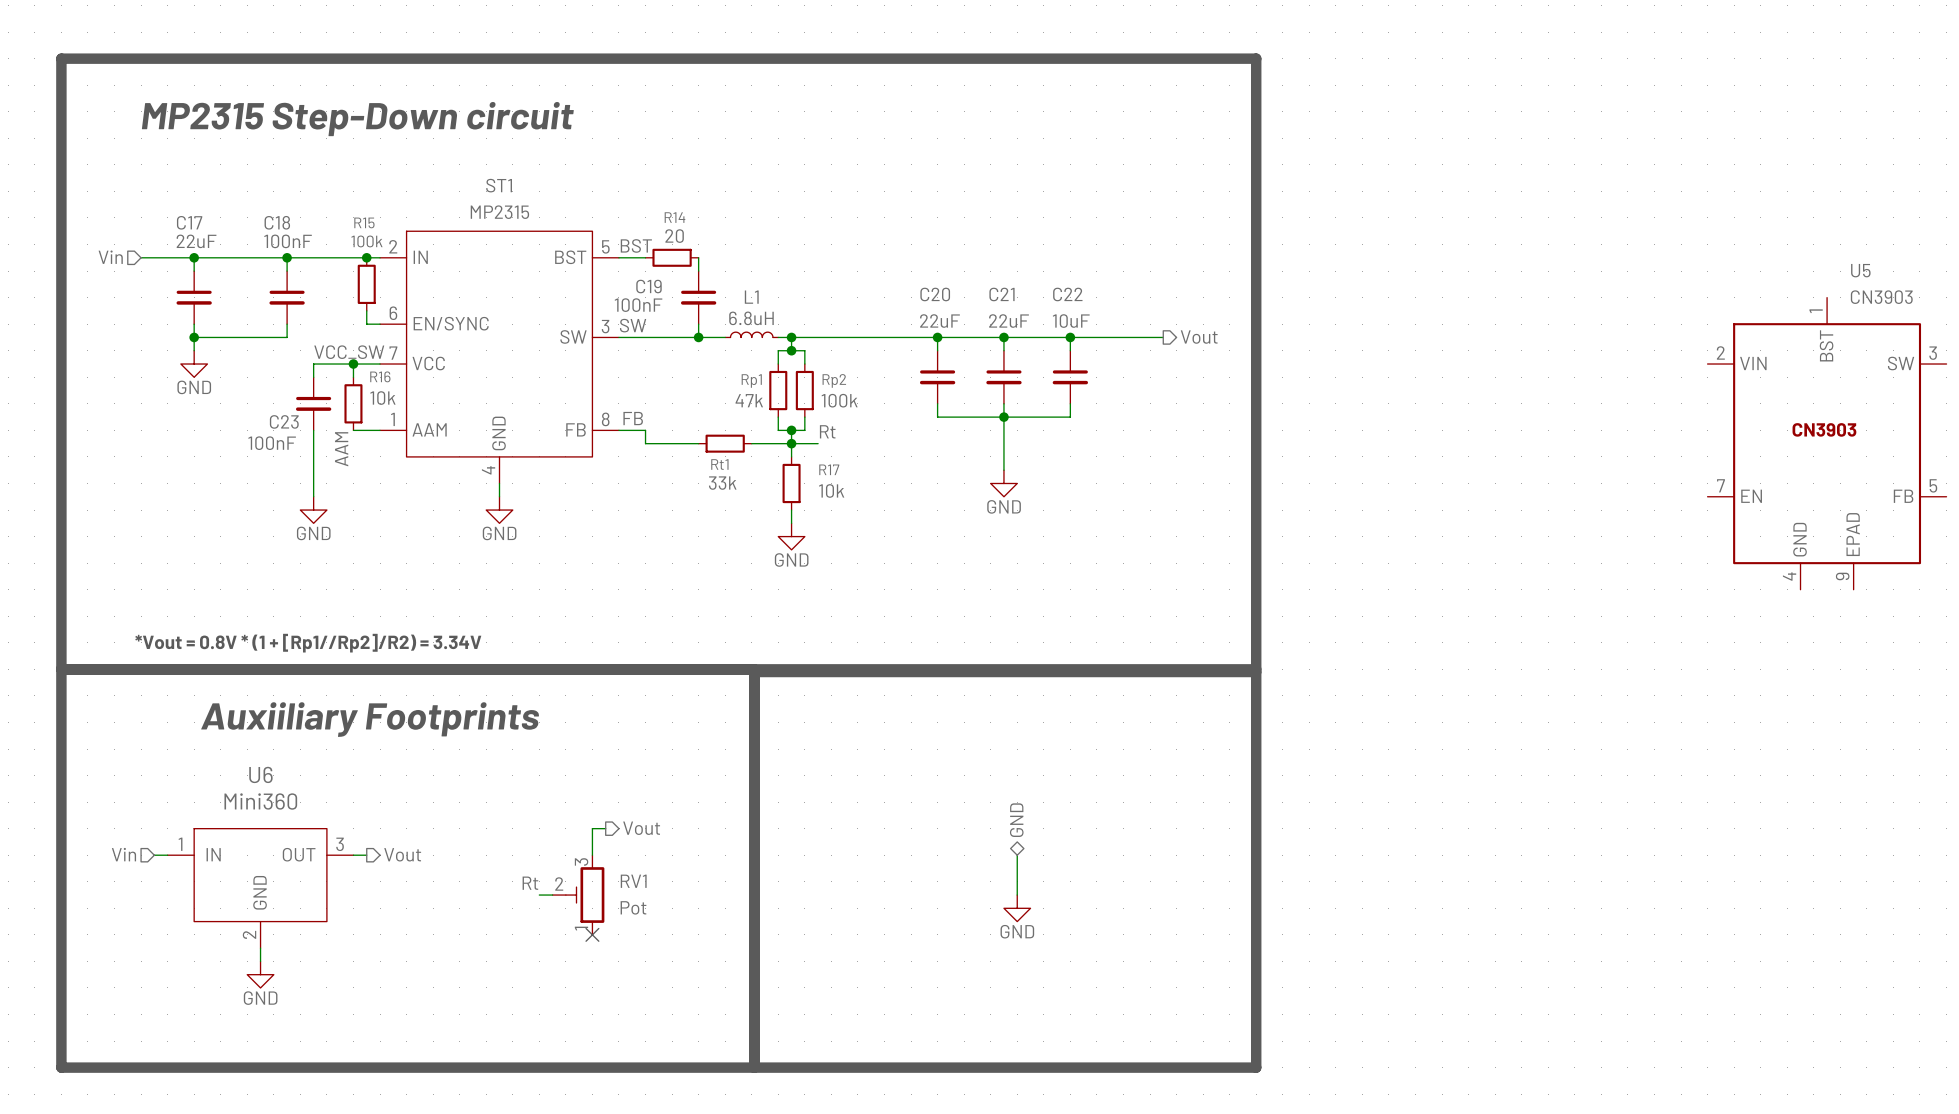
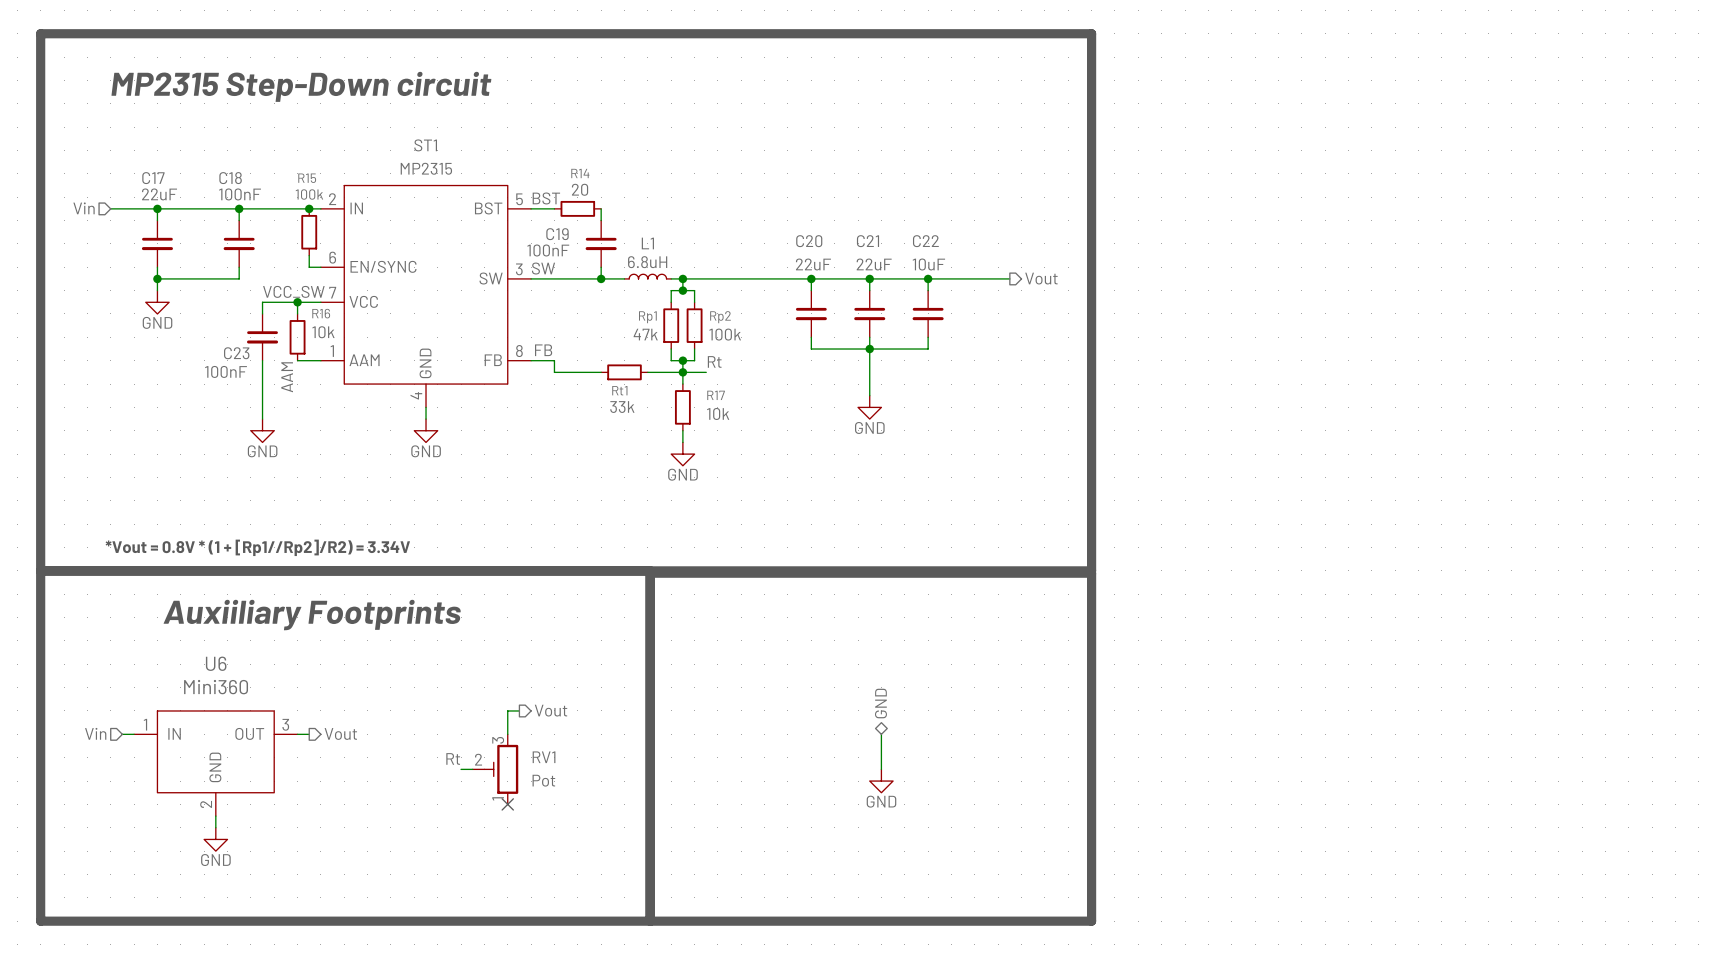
U5: CN3903 (1827, 443) -> none

